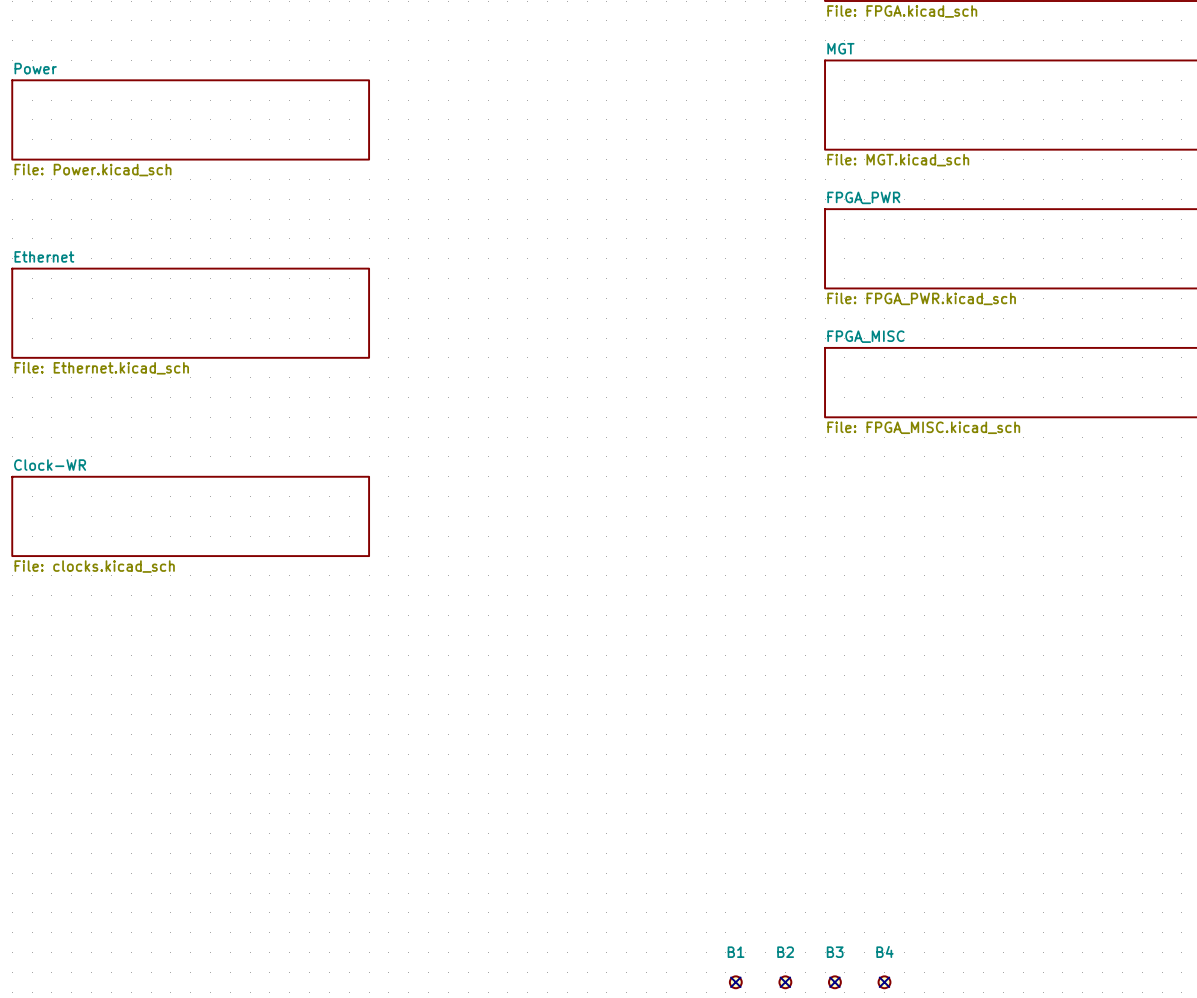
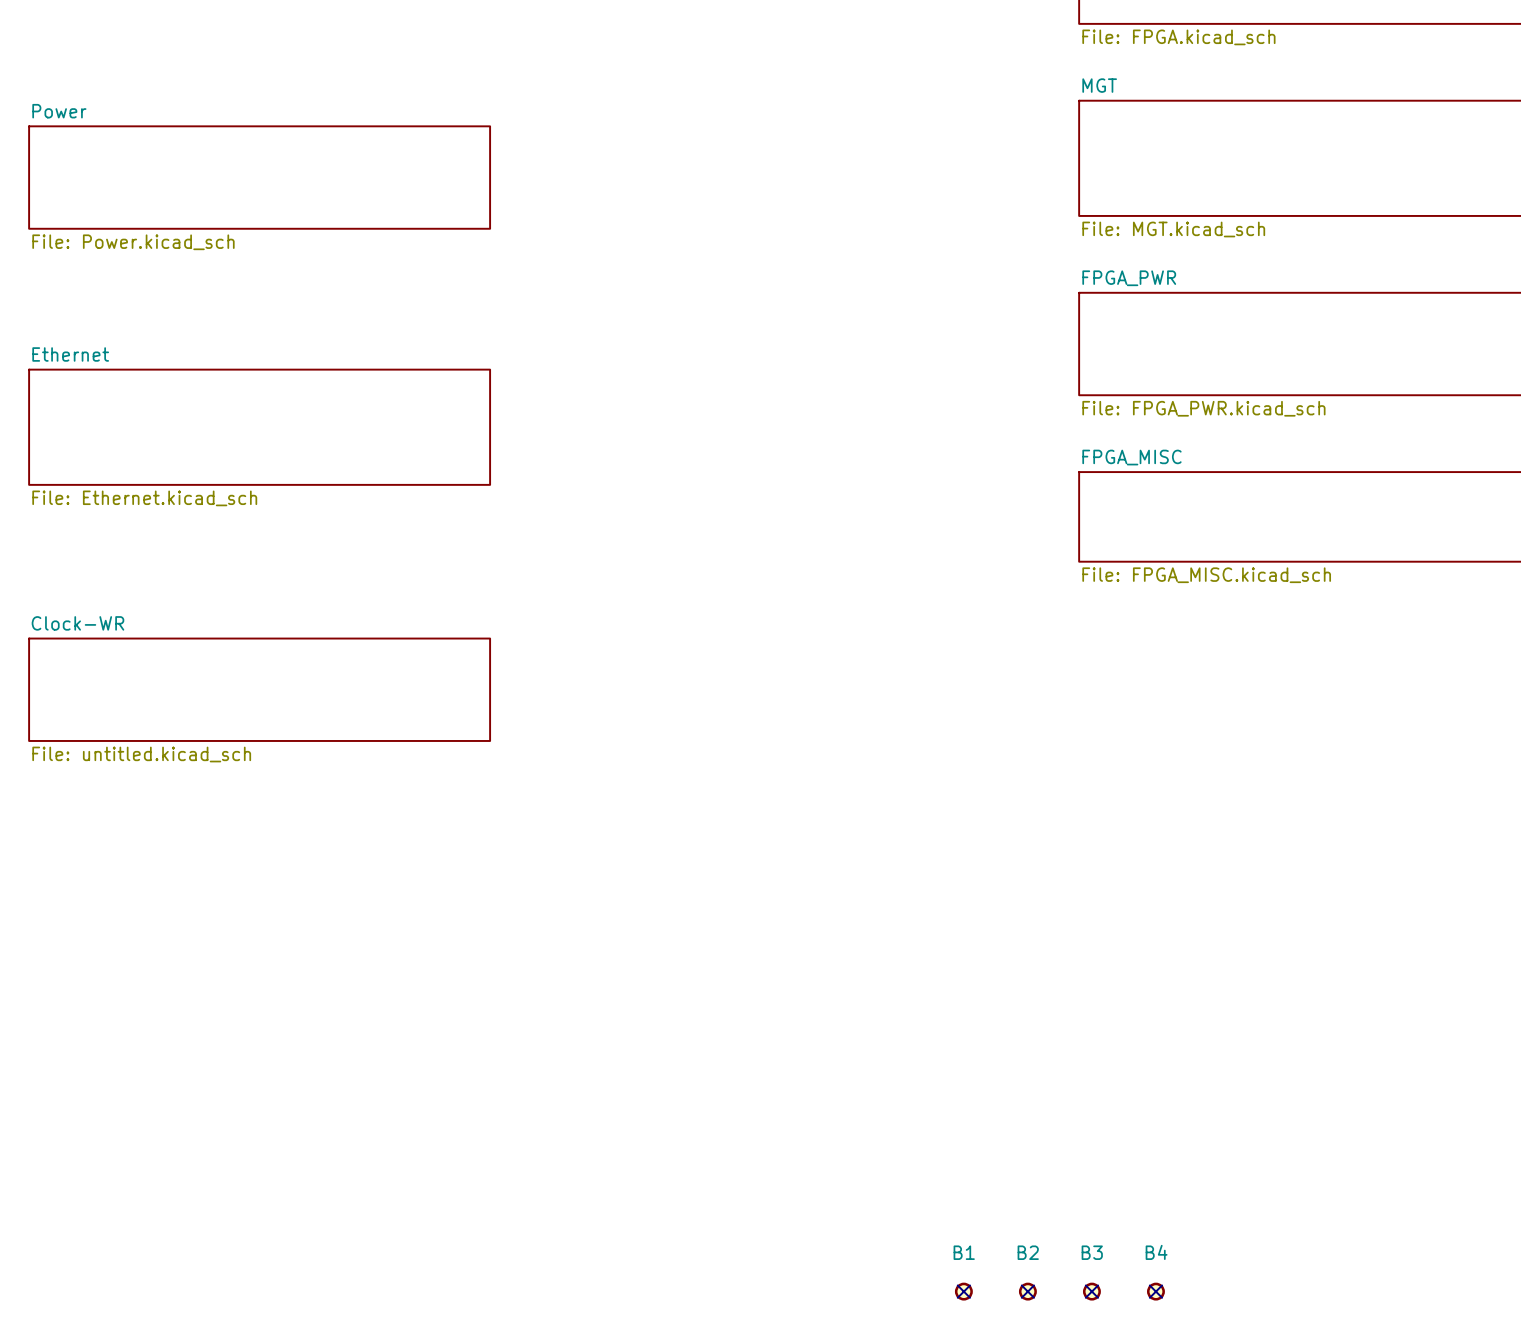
sheet Clock-WR value: File: clocks.kicad_sch (94, 566) -> File: untitled.kicad_sch (141, 754)

